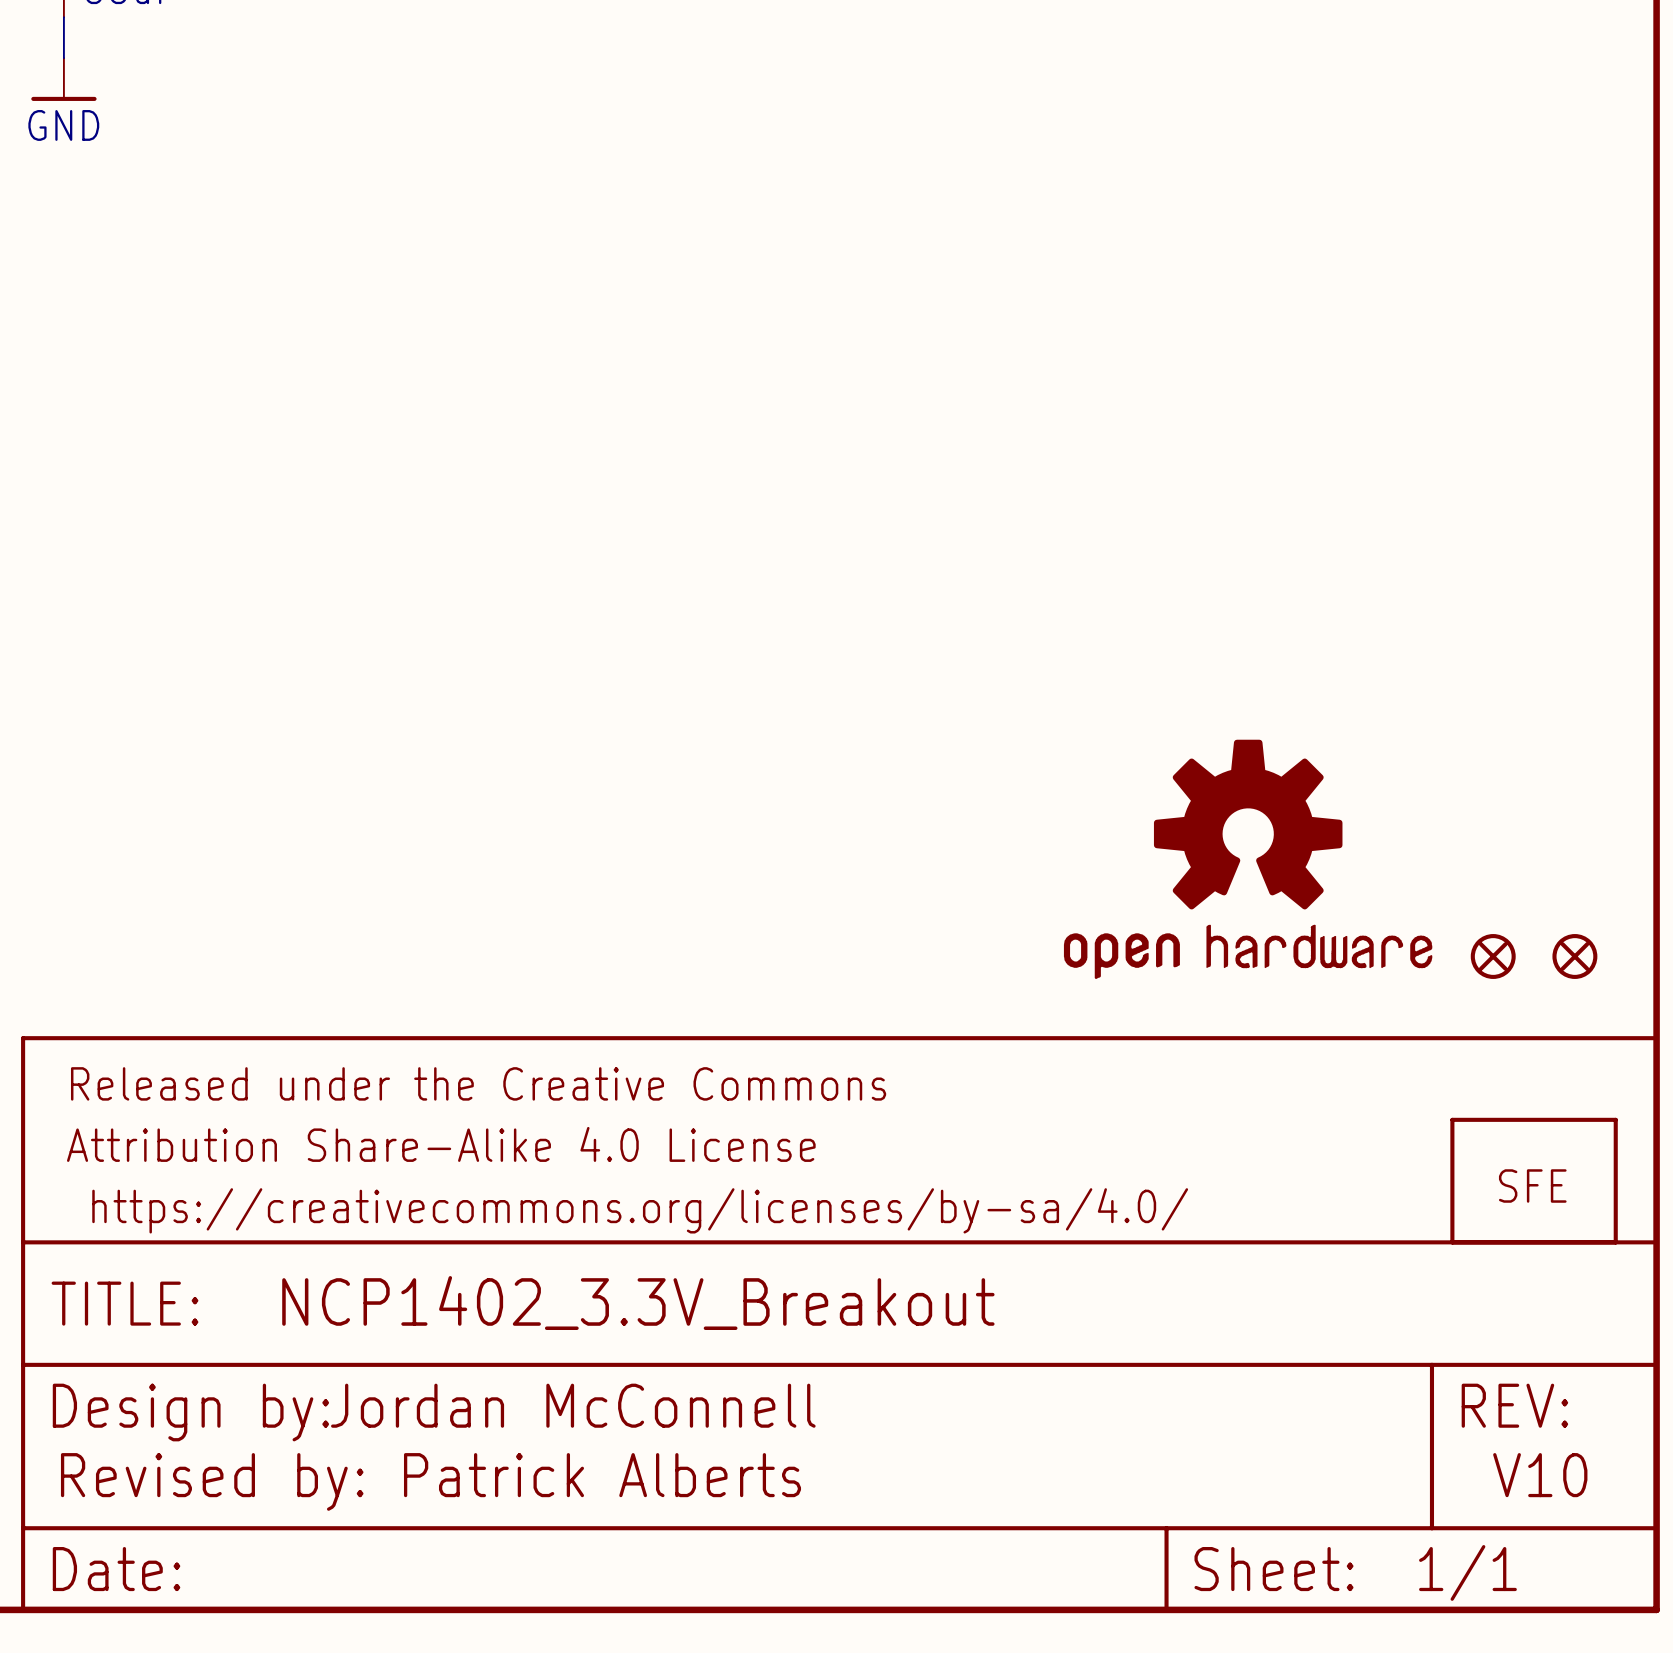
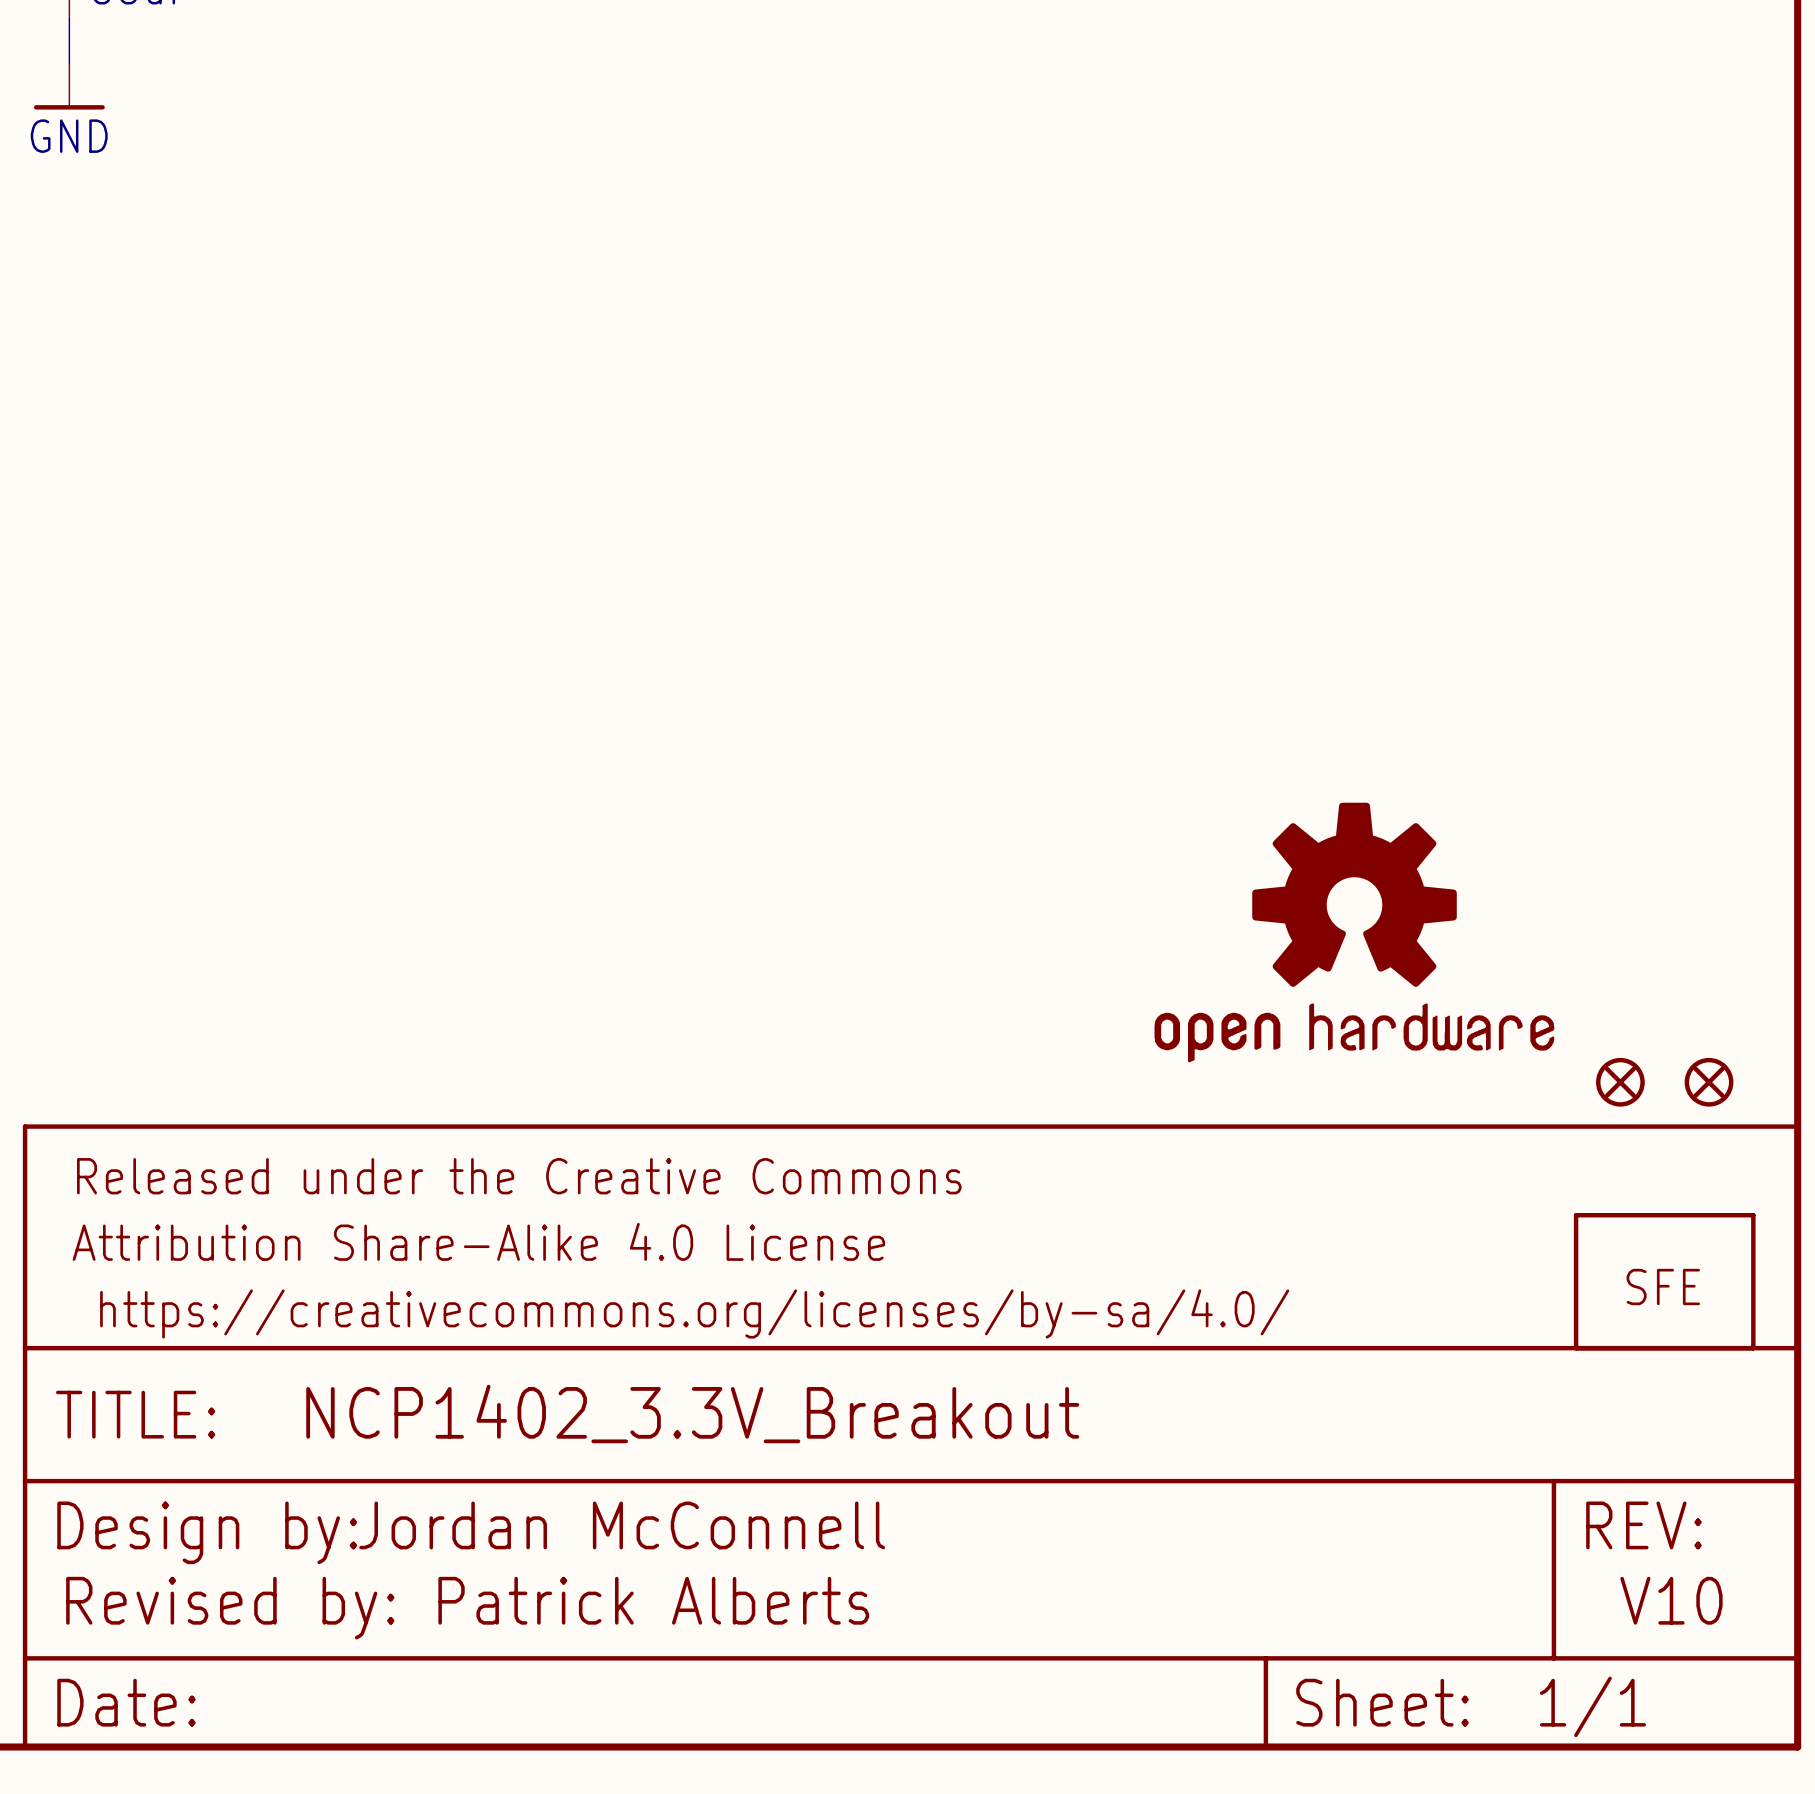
part position: (1493, 956) -> (1620, 1082)
part position: (1574, 956) -> (1709, 1082)

